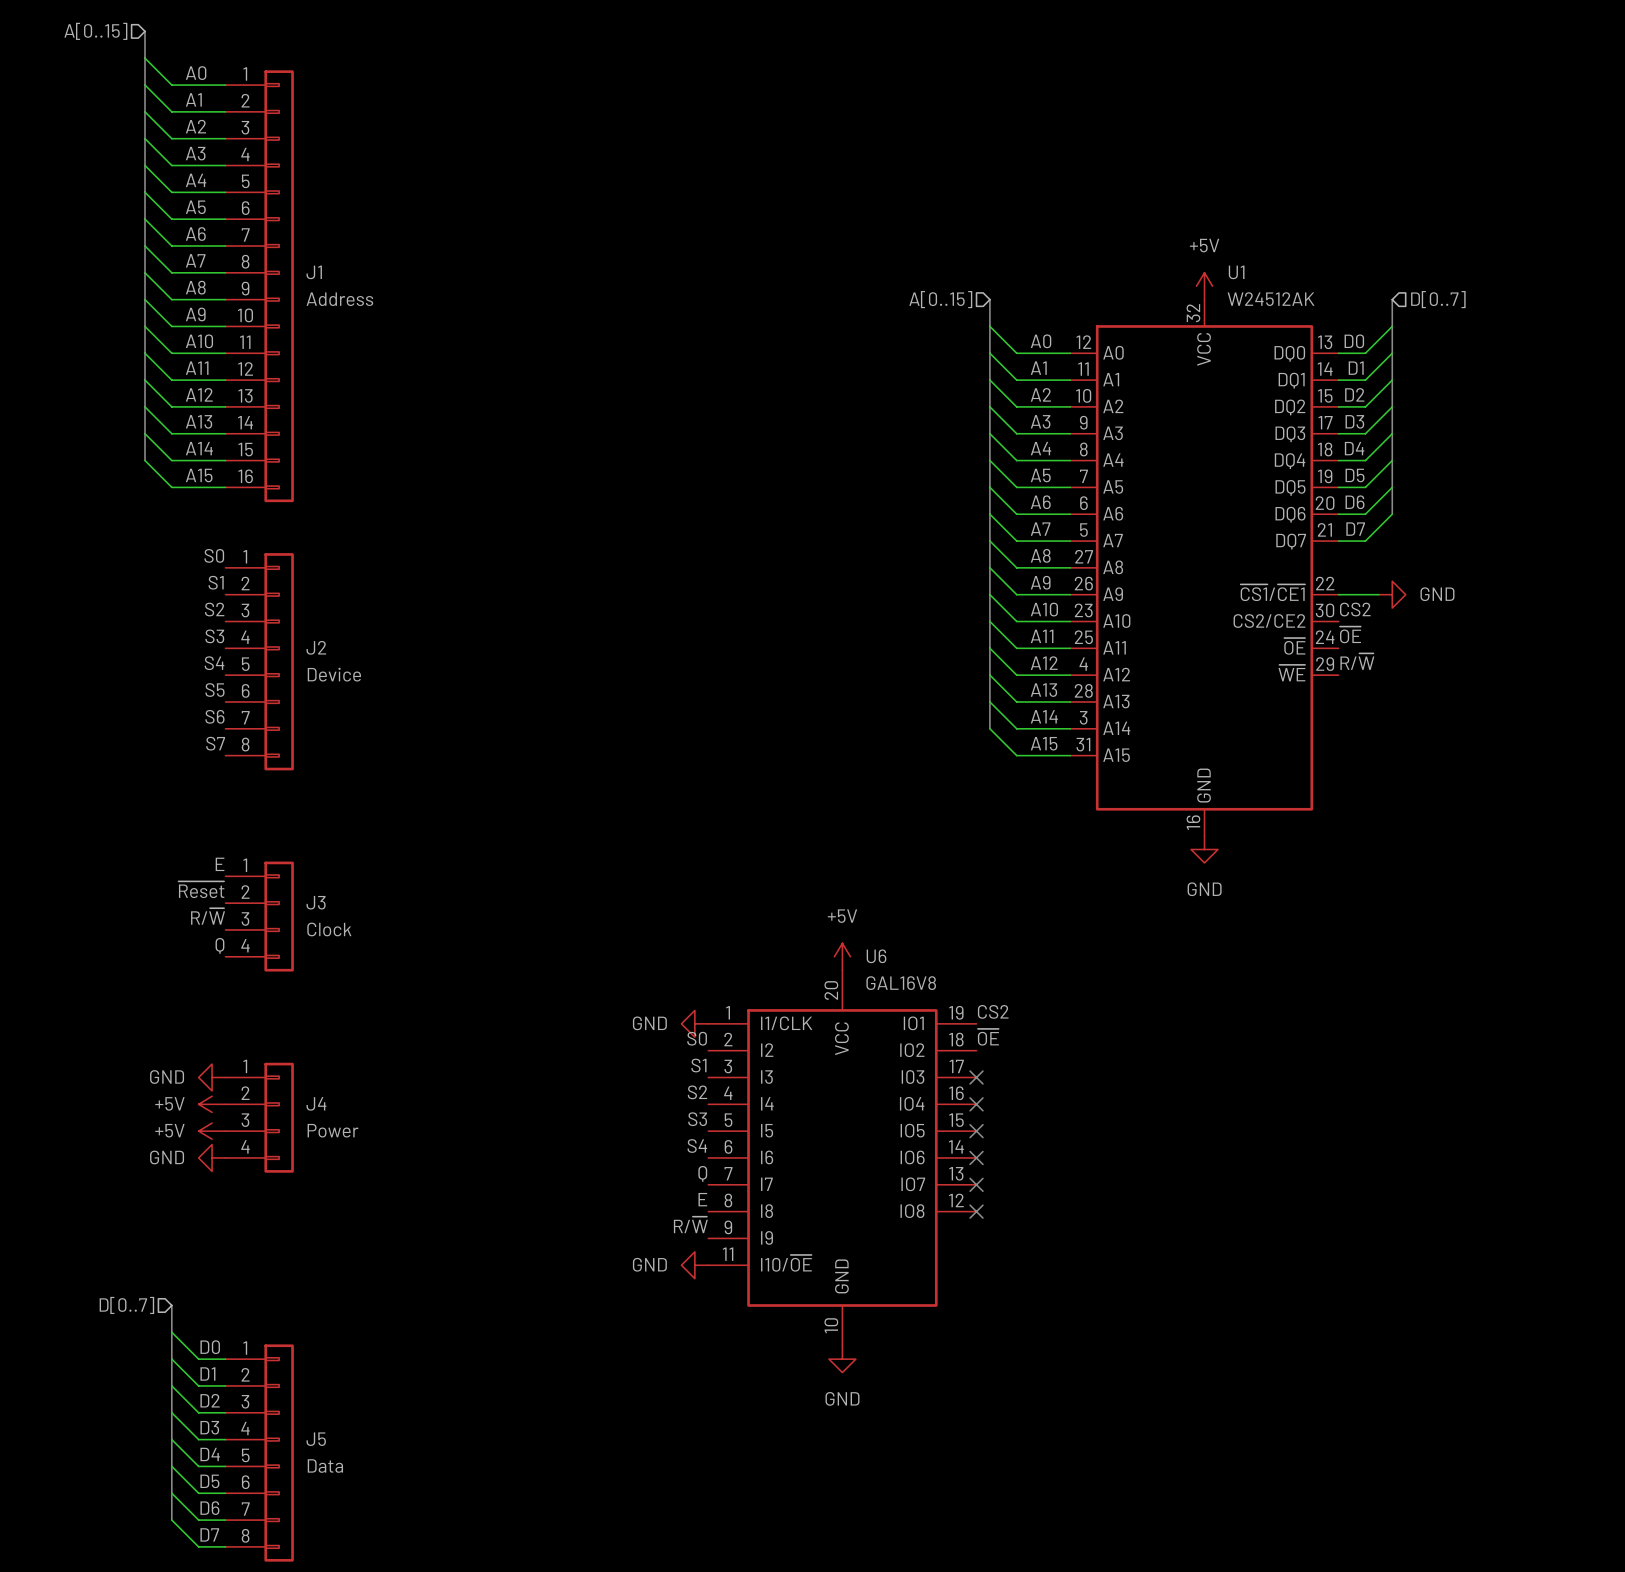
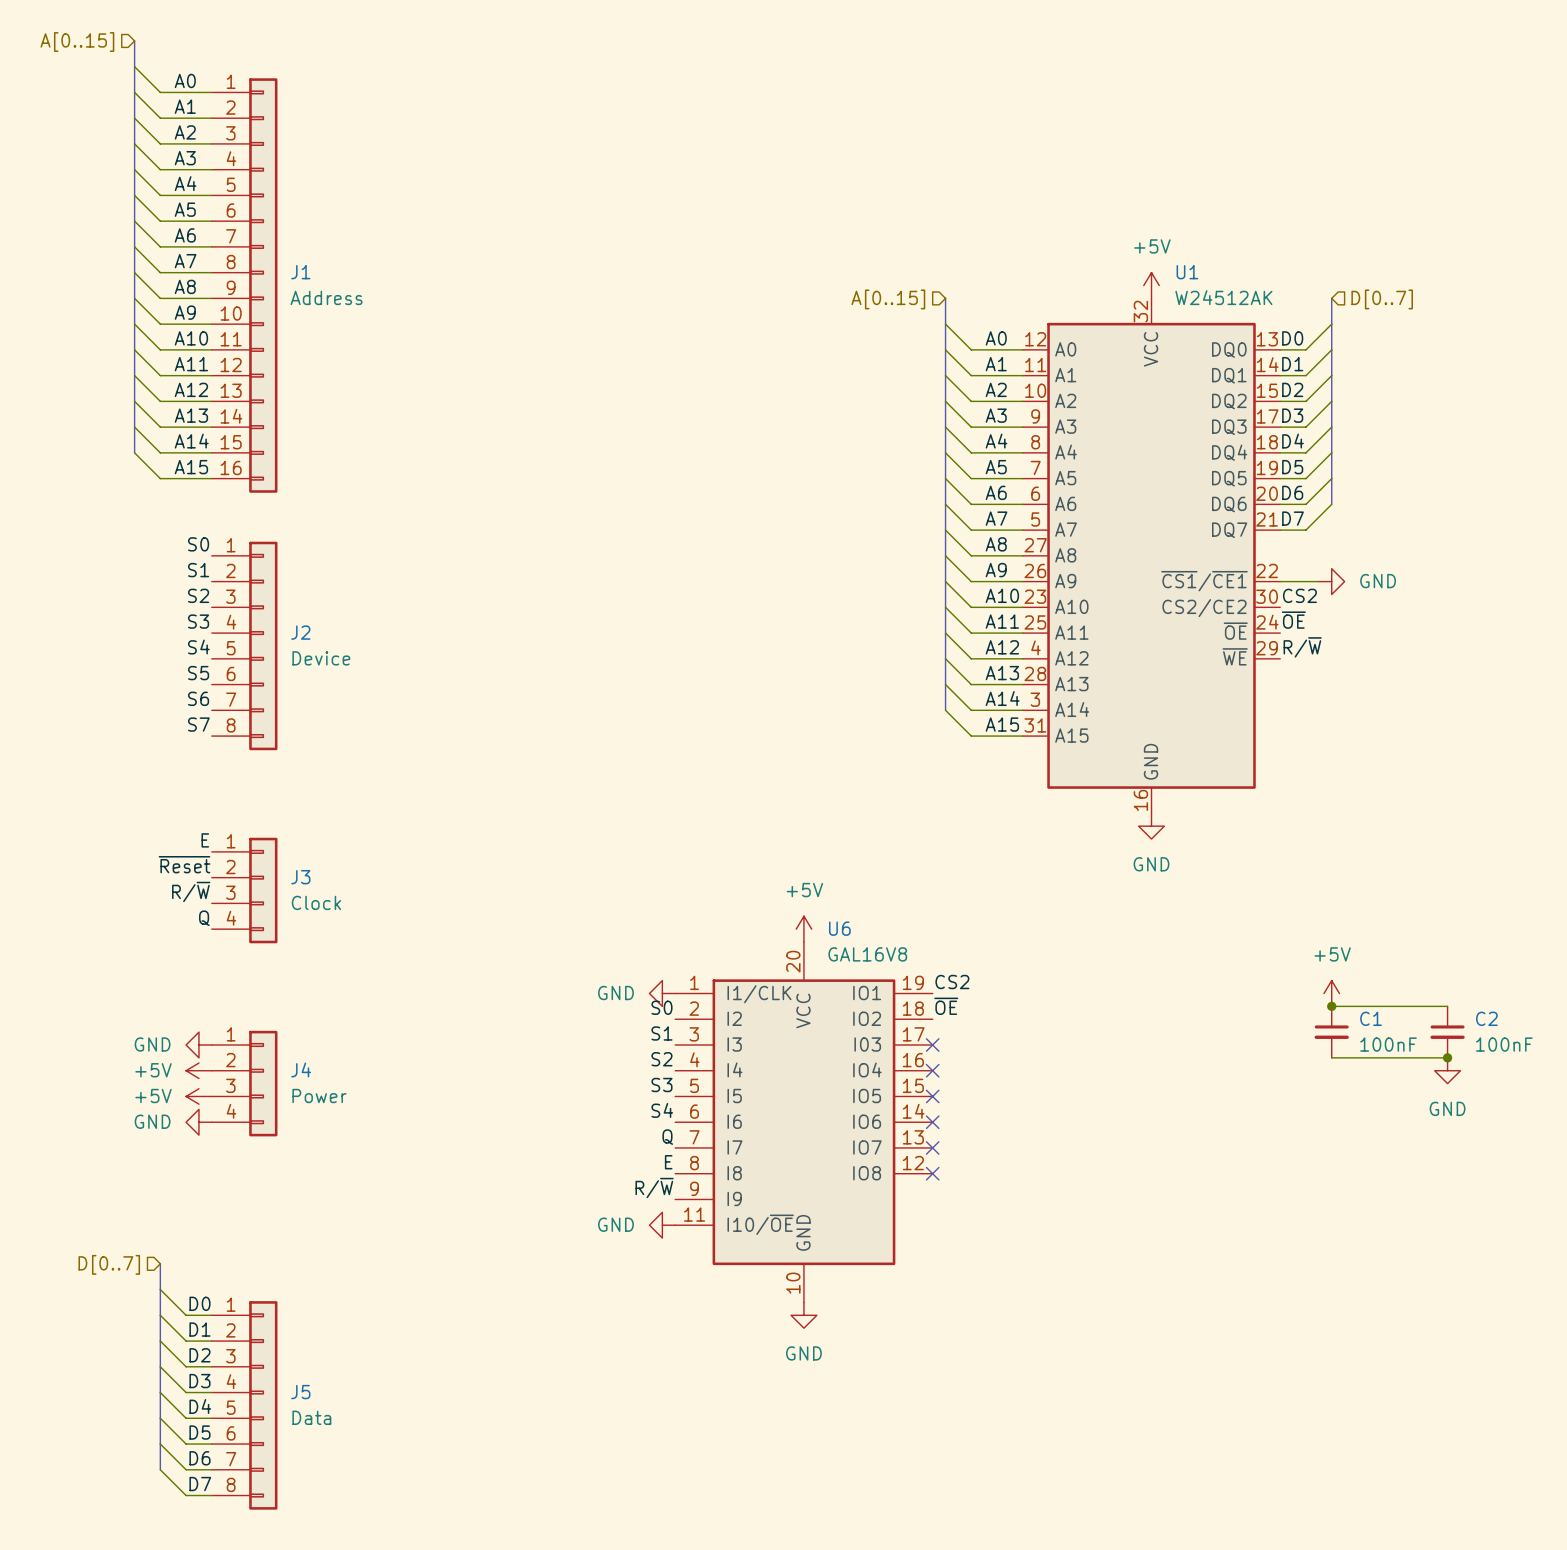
power symbol: none -> +5V (1331, 993)
wire: none -> (1331, 1006) (1447, 1006)
junction: none -> (1331, 1006)
C1: none -> 100nF (1331, 1032)
C2: none -> 100nF (1447, 1032)
wire: none -> (1331, 1057) (1447, 1057)
junction: none -> (1447, 1057)
power symbol: none -> GND (1447, 1070)

